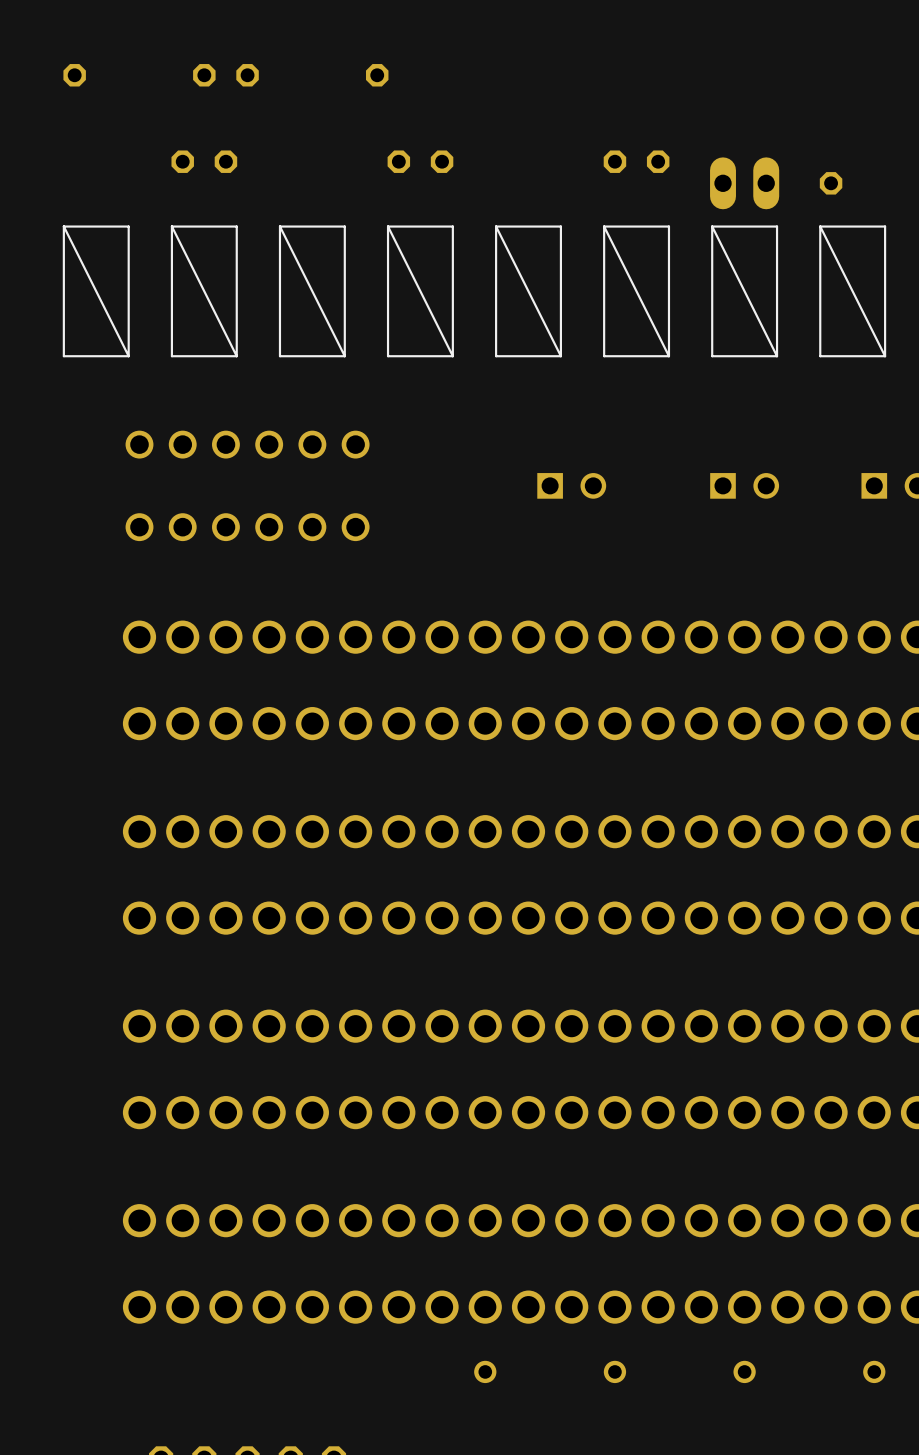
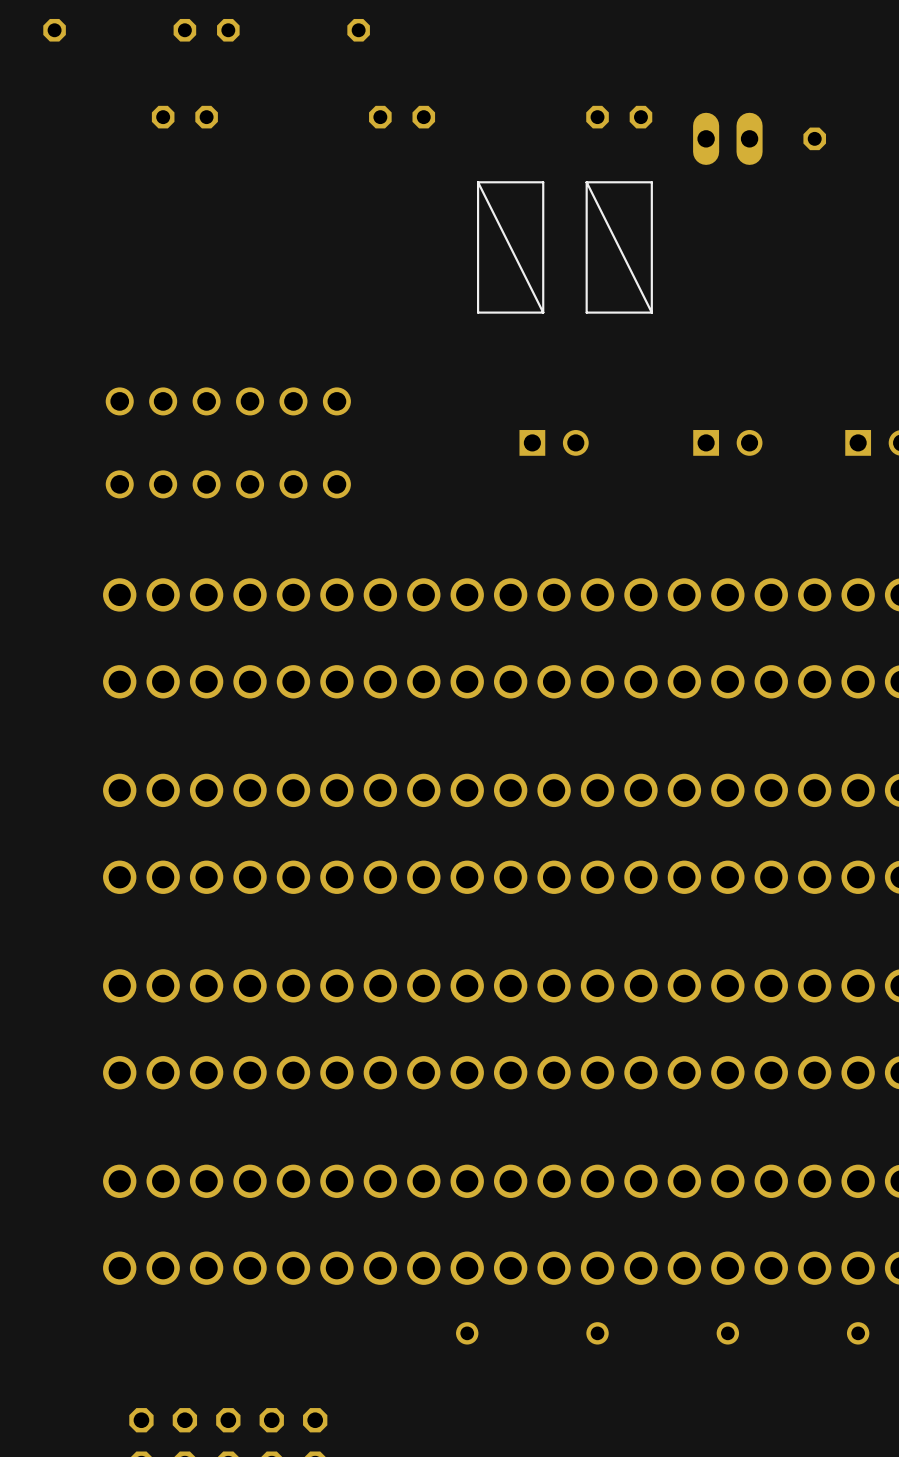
part: (96, 291) -> none
part: (204, 291) -> none
part: (312, 291) -> none
part: (420, 291) -> none
part: (744, 291) -> none
part: (852, 291) -> none

